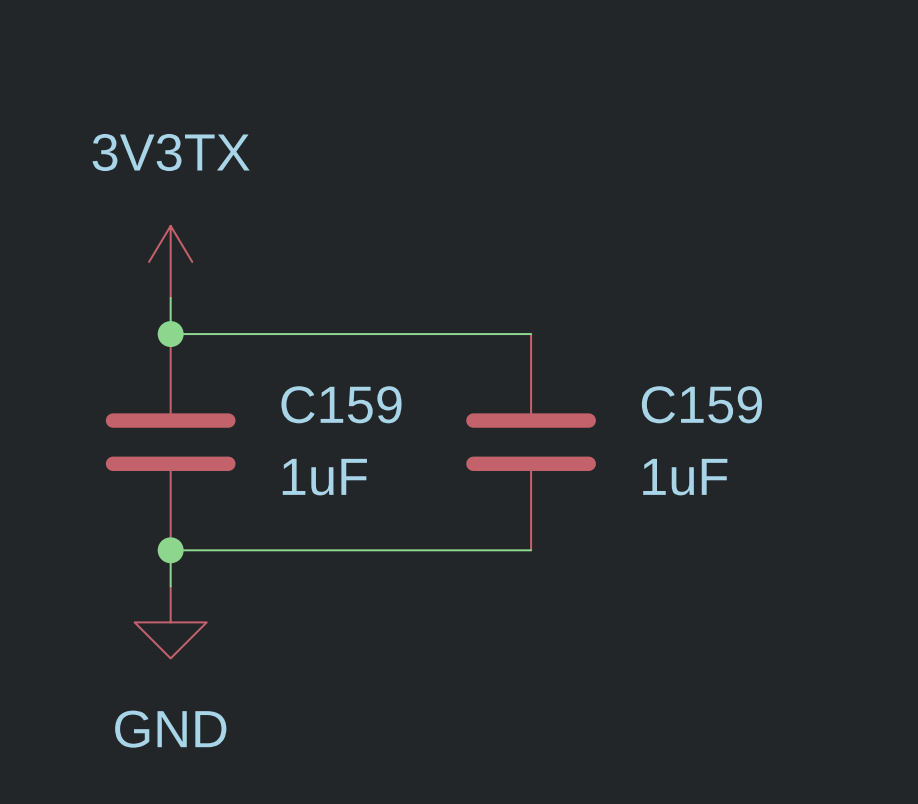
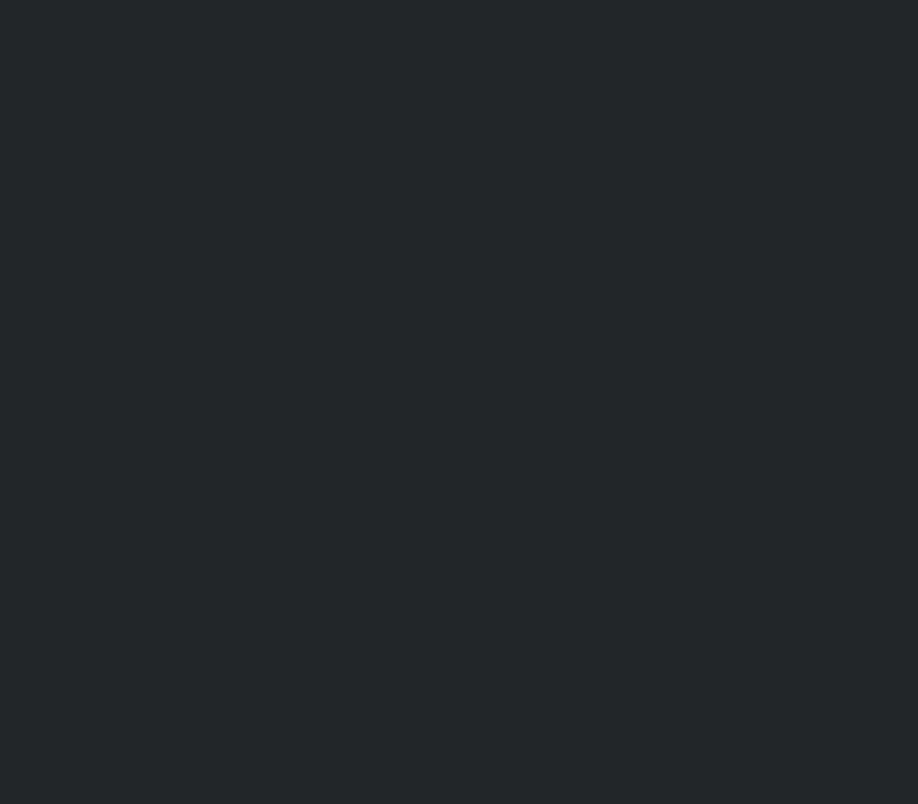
power symbol: 3V3TX (170, 261) -> none
wire: (170, 298) (170, 334) (531, 334) -> none
junction: (170, 334) -> none
C159: 1uF (170, 442) -> none
C159: 1uF (531, 442) -> none
junction: (170, 550) -> none
wire: (531, 550) (170, 550) (170, 586) -> none
power symbol: GND (170, 622) -> none

